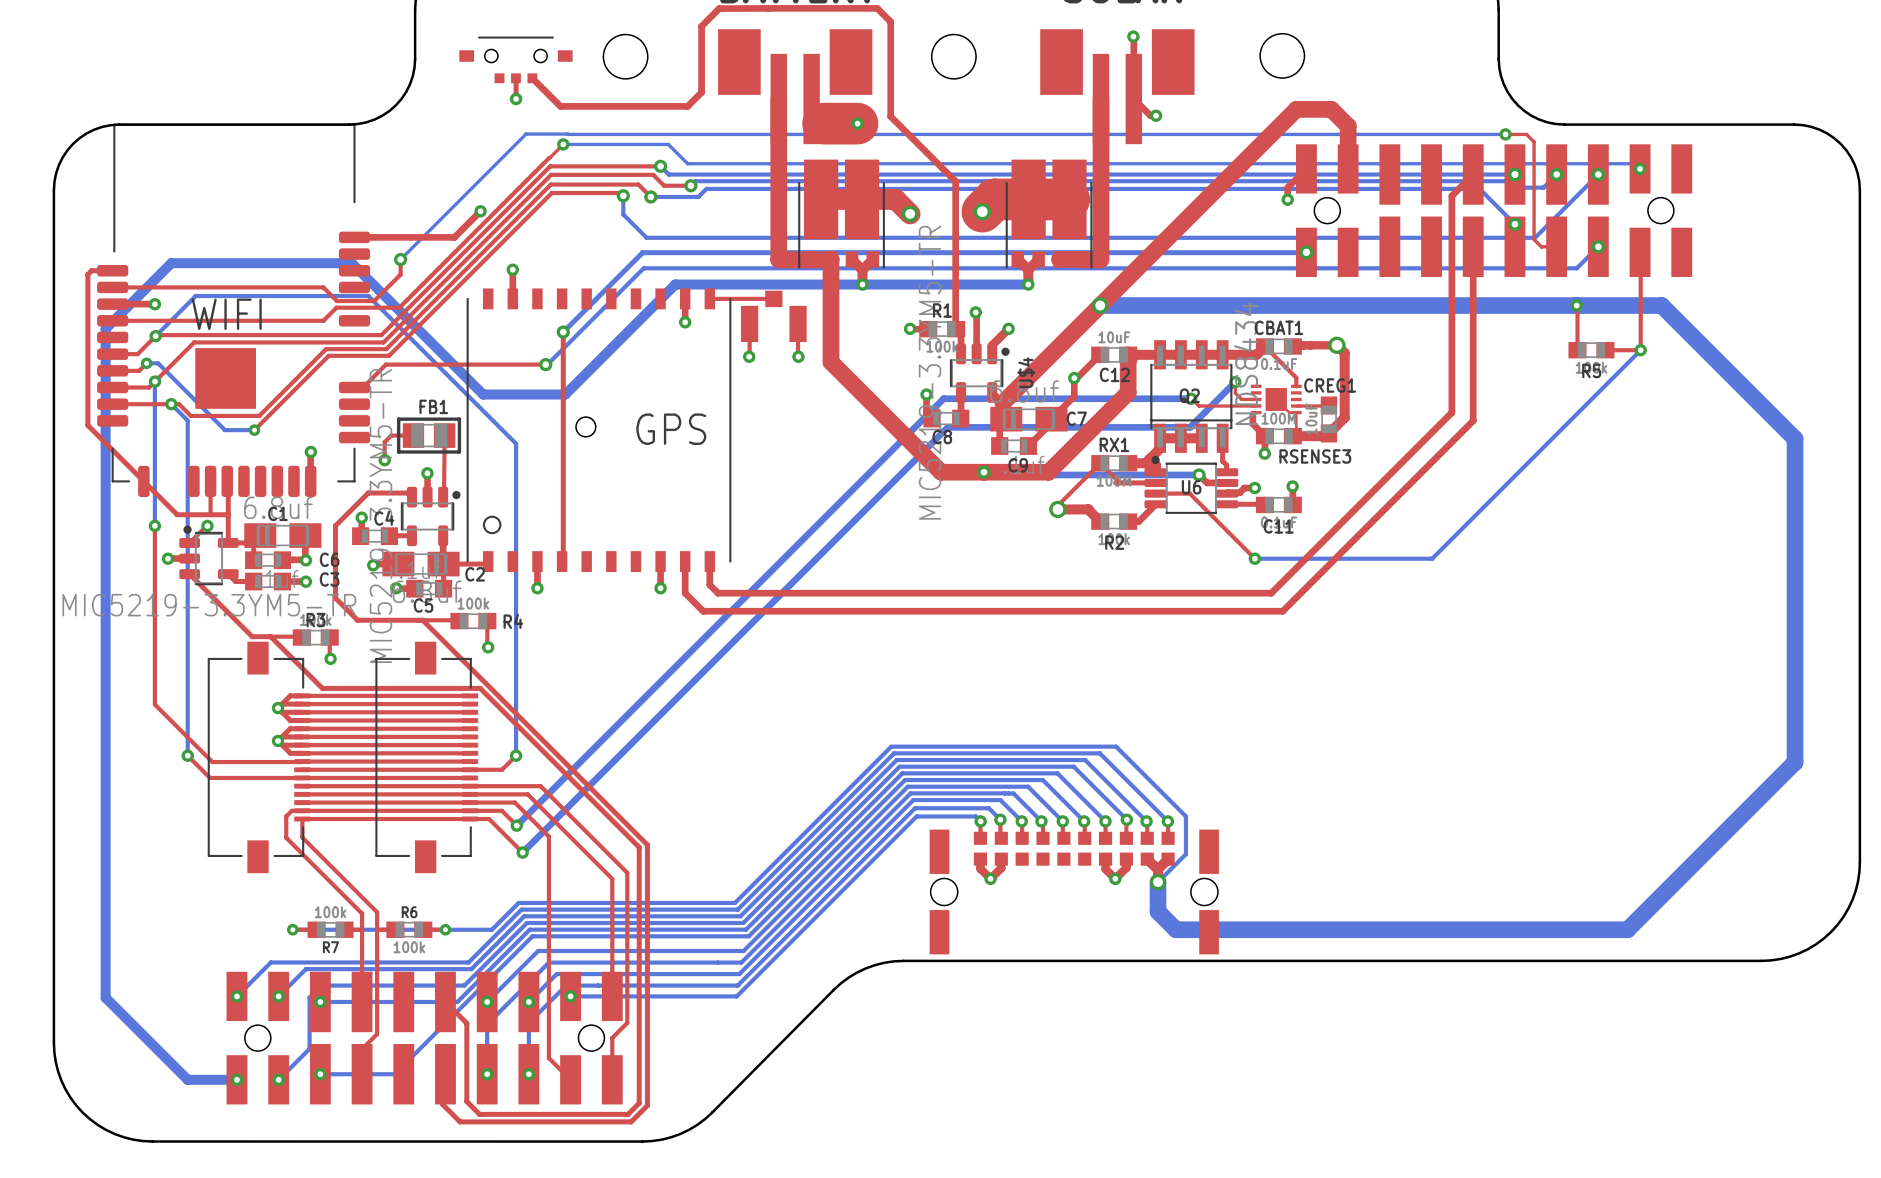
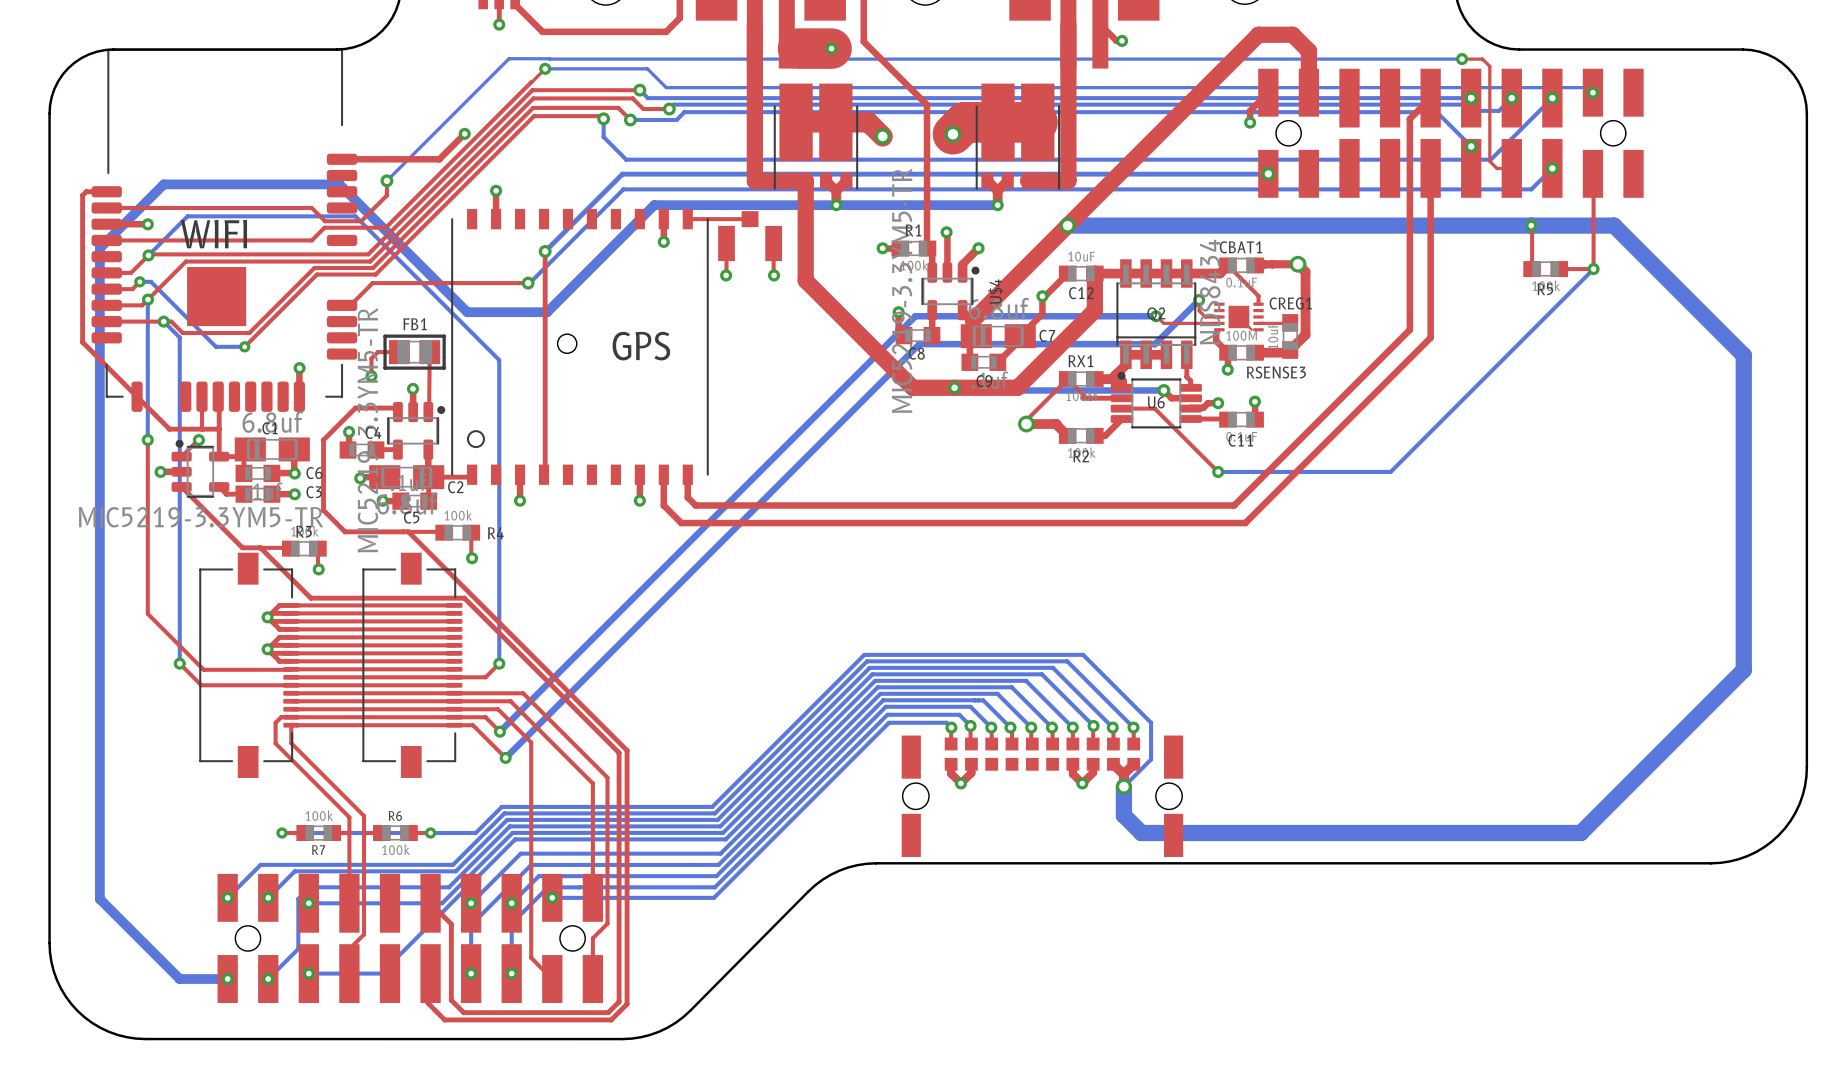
top track: (1289, 412) (1296, 412) (1296, 432) -> none

